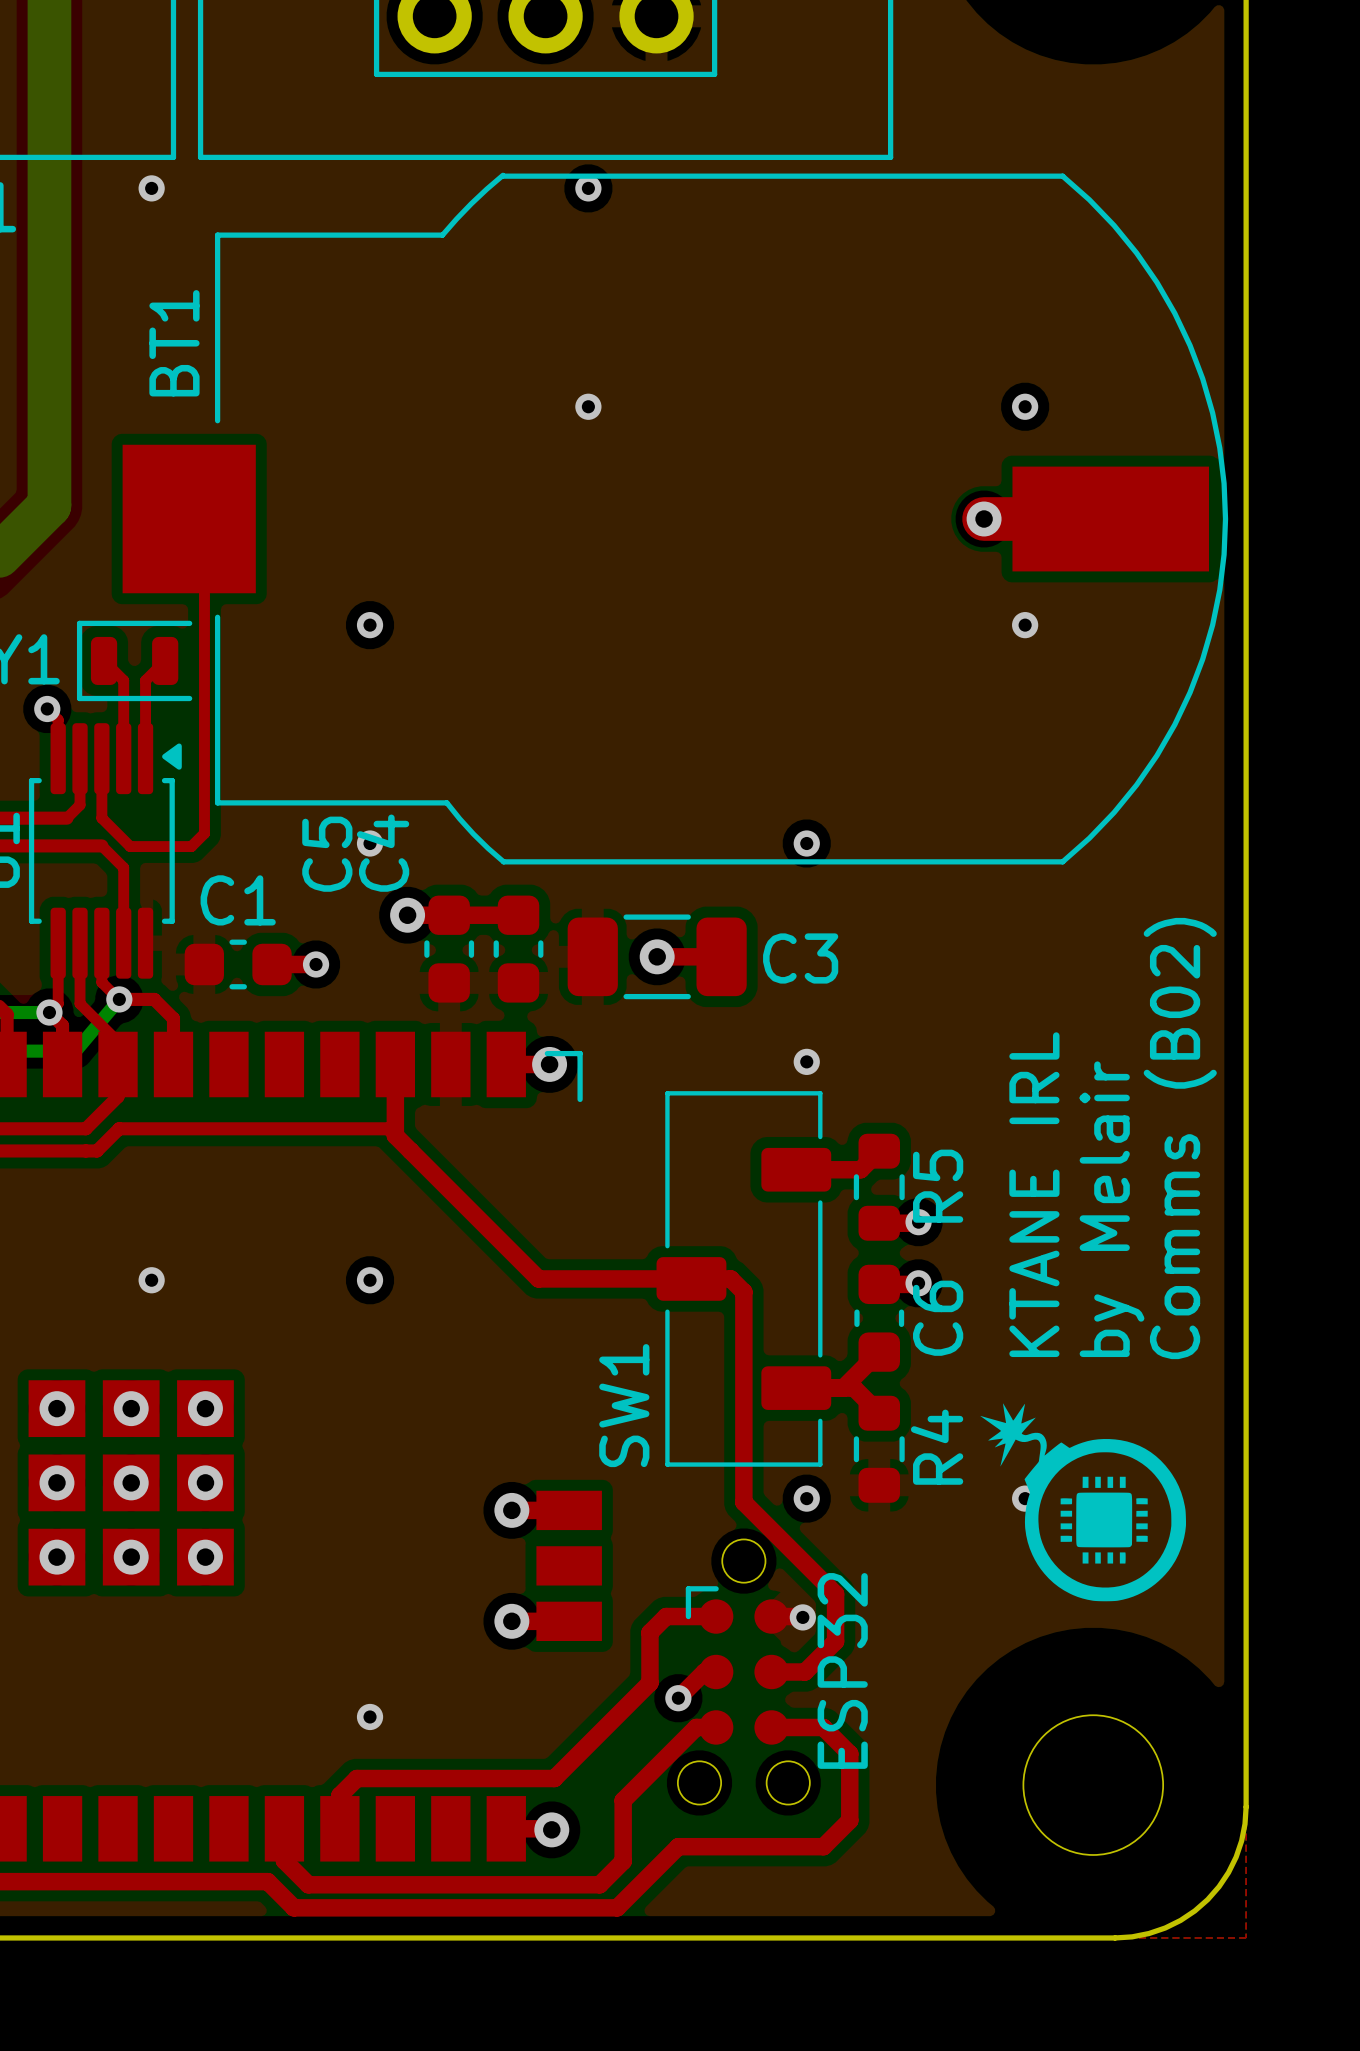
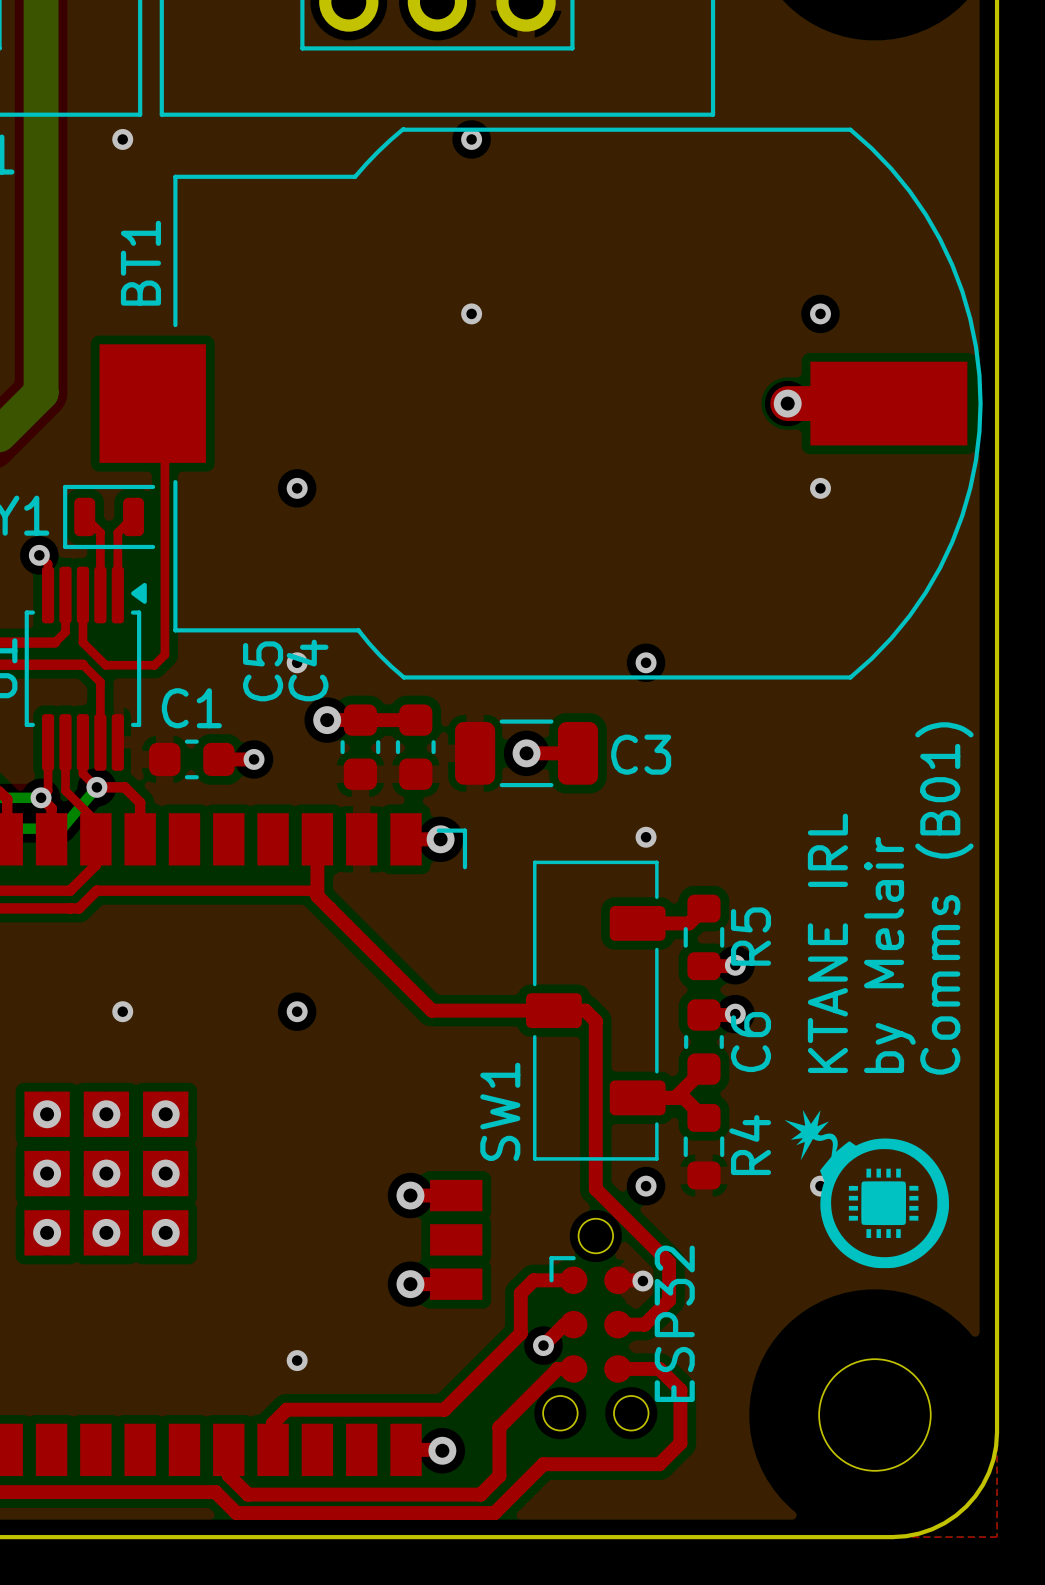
text: Comms (B02) (1180, 1138) -> Comms (B01) (944, 898)

